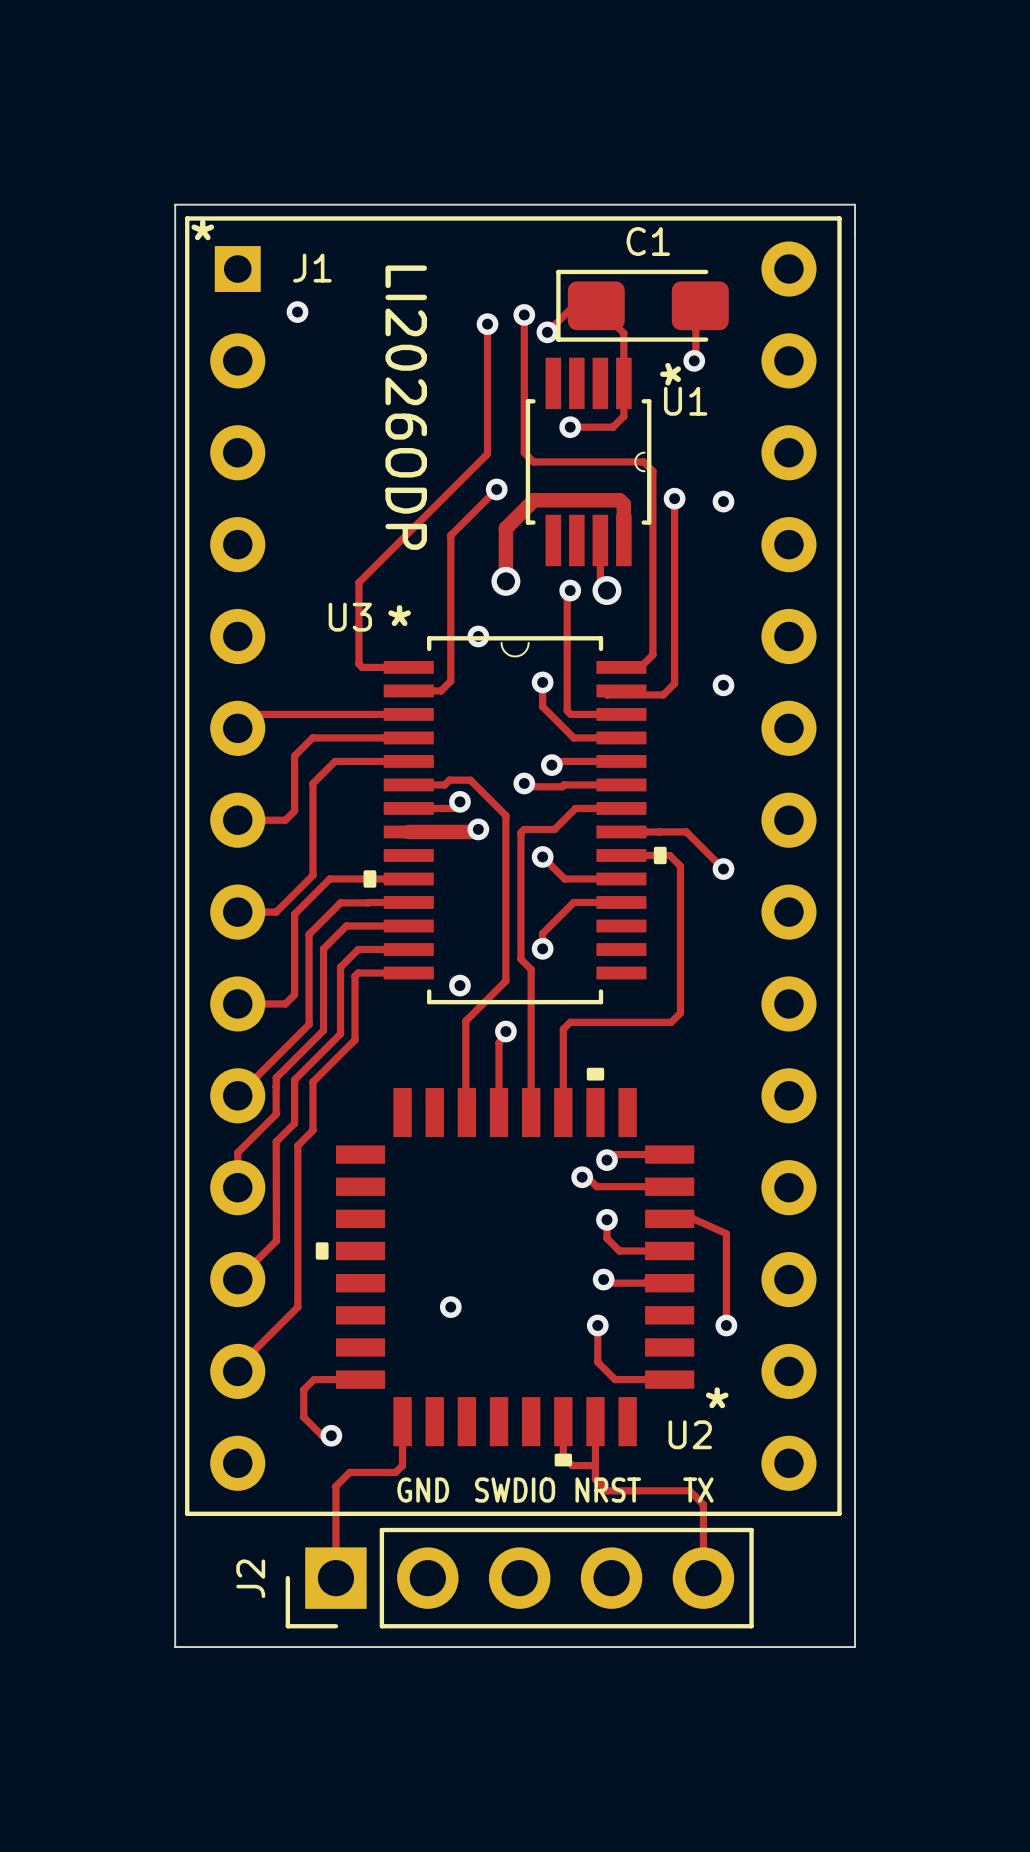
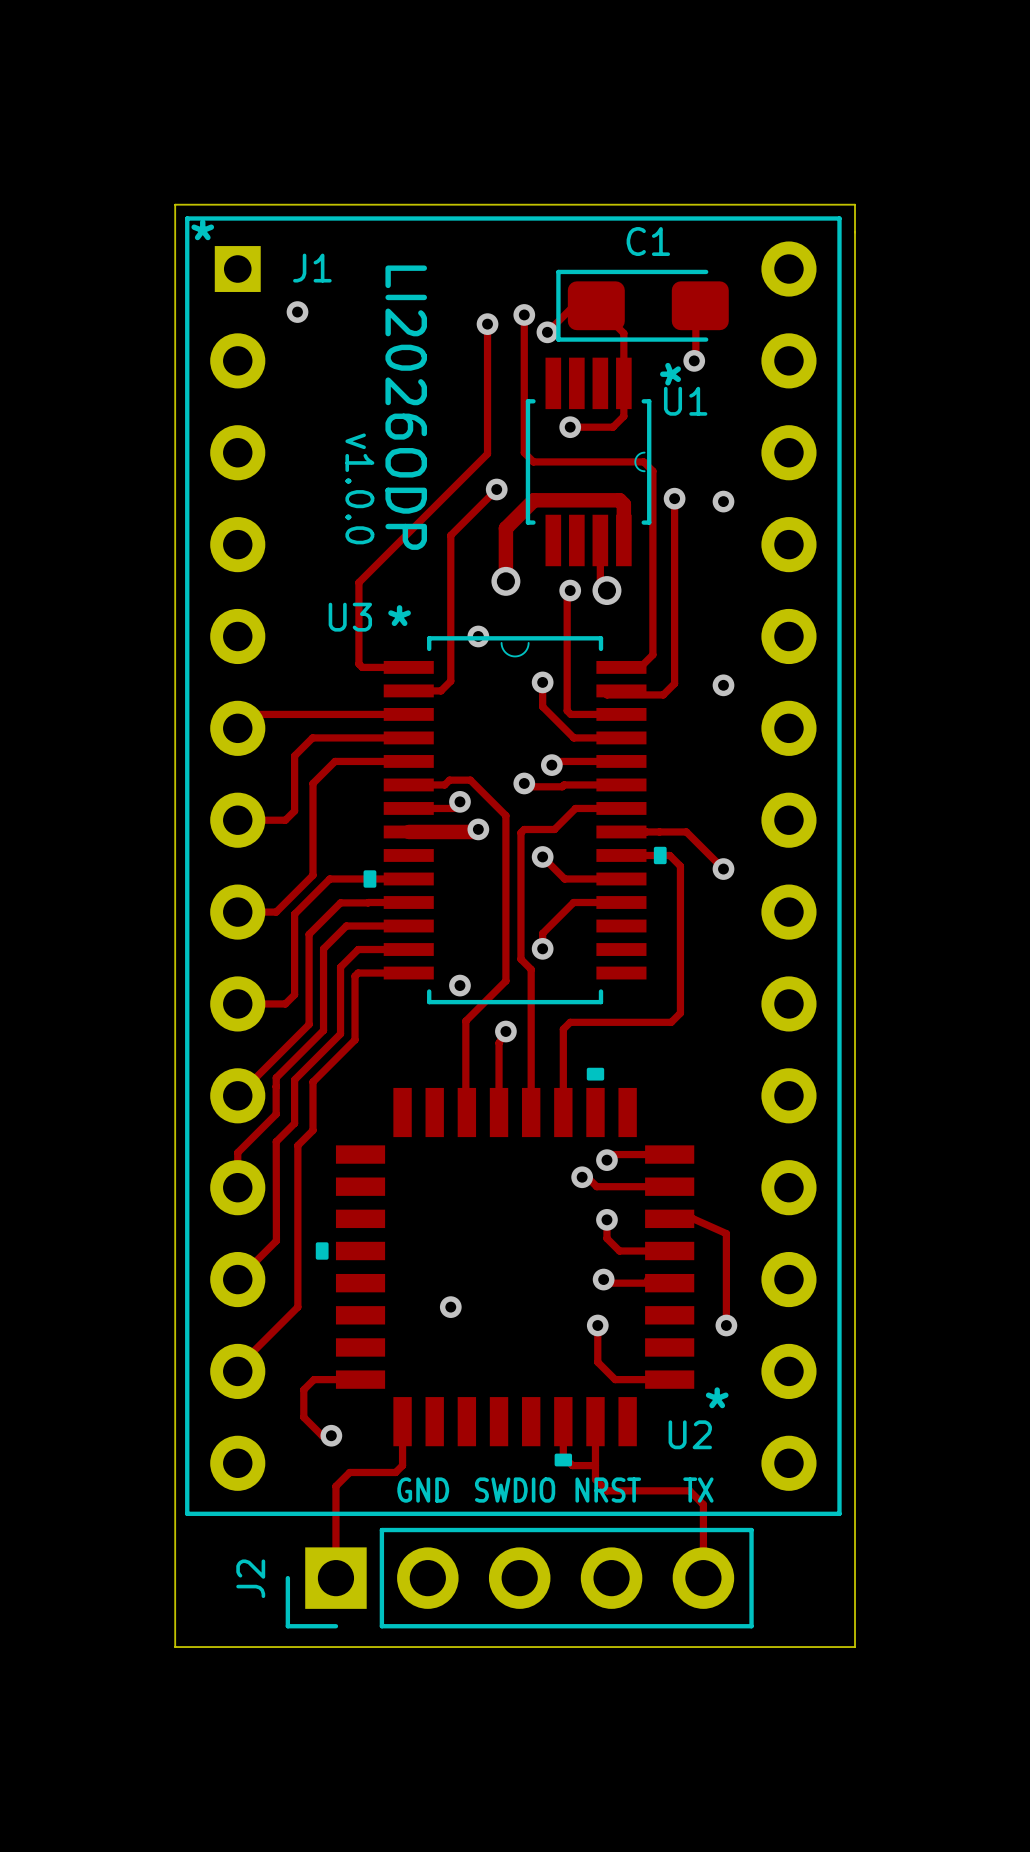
text: none -> v1.0.0 (359, 488)

